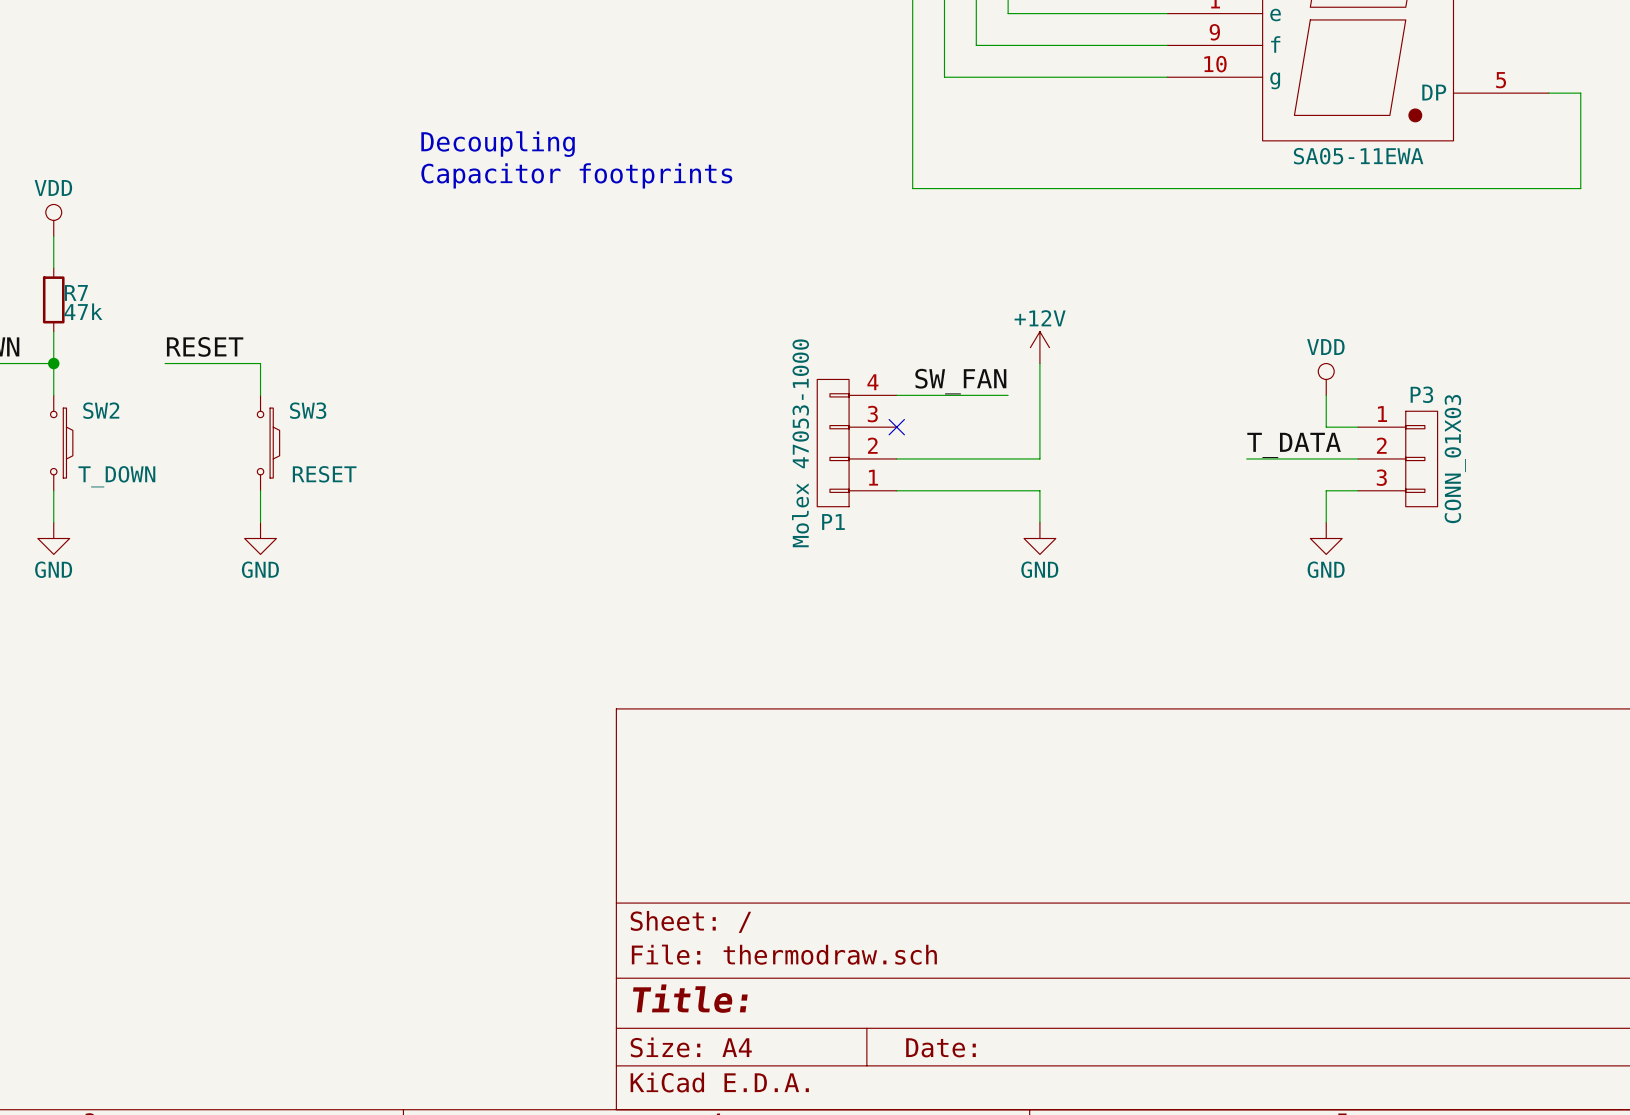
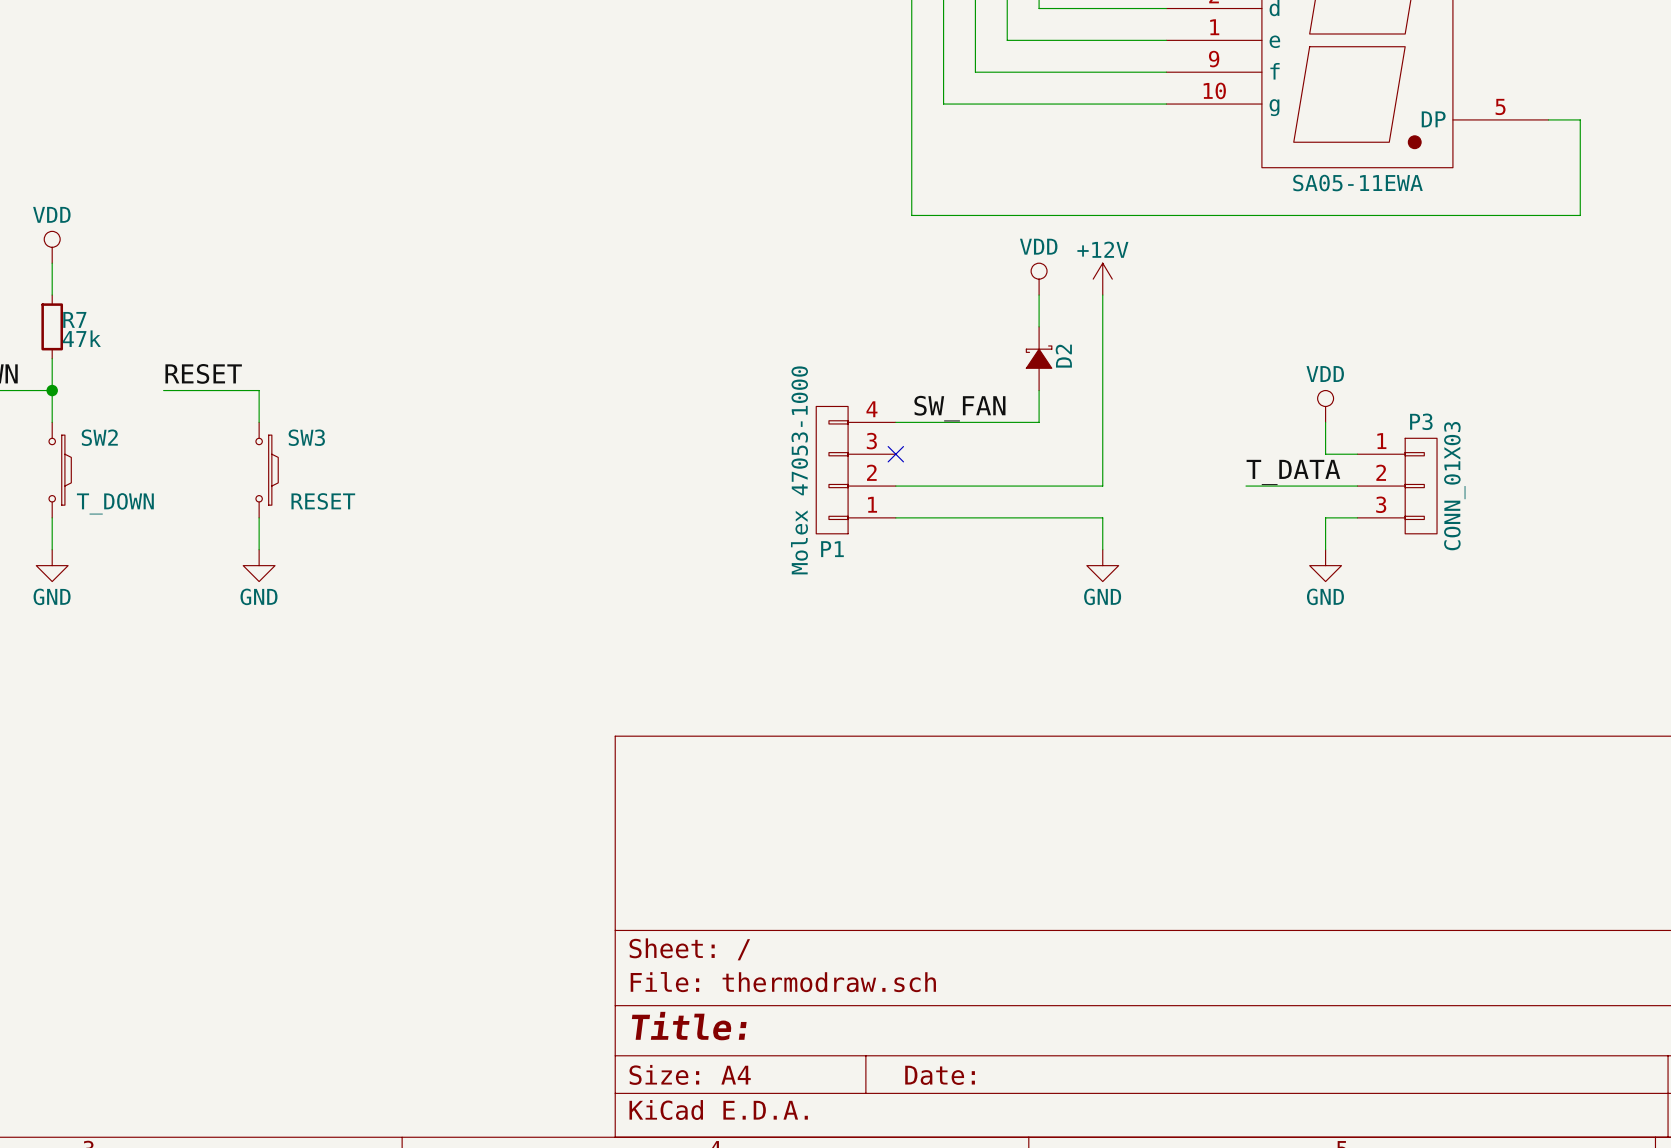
text: Decoupling (498, 144) -> none
text: Capacitor footprints (576, 175) -> none
power symbol: none -> VDD (1039, 279)
wire: none -> (1039, 295) (1039, 326)
wire: none -> (1102, 295) (1102, 486) (1039, 486)
D2: none -> (1039, 358)
power symbol position: +12V (1039, 347) -> +12V (1102, 279)
wire: (1039, 395) (1039, 458) -> (1039, 422) (1007, 422)
wire: (1039, 490) (1039, 522) -> (1039, 517) (1102, 517) (1102, 549)
power symbol position: GND (1039, 538) -> GND (1102, 565)

